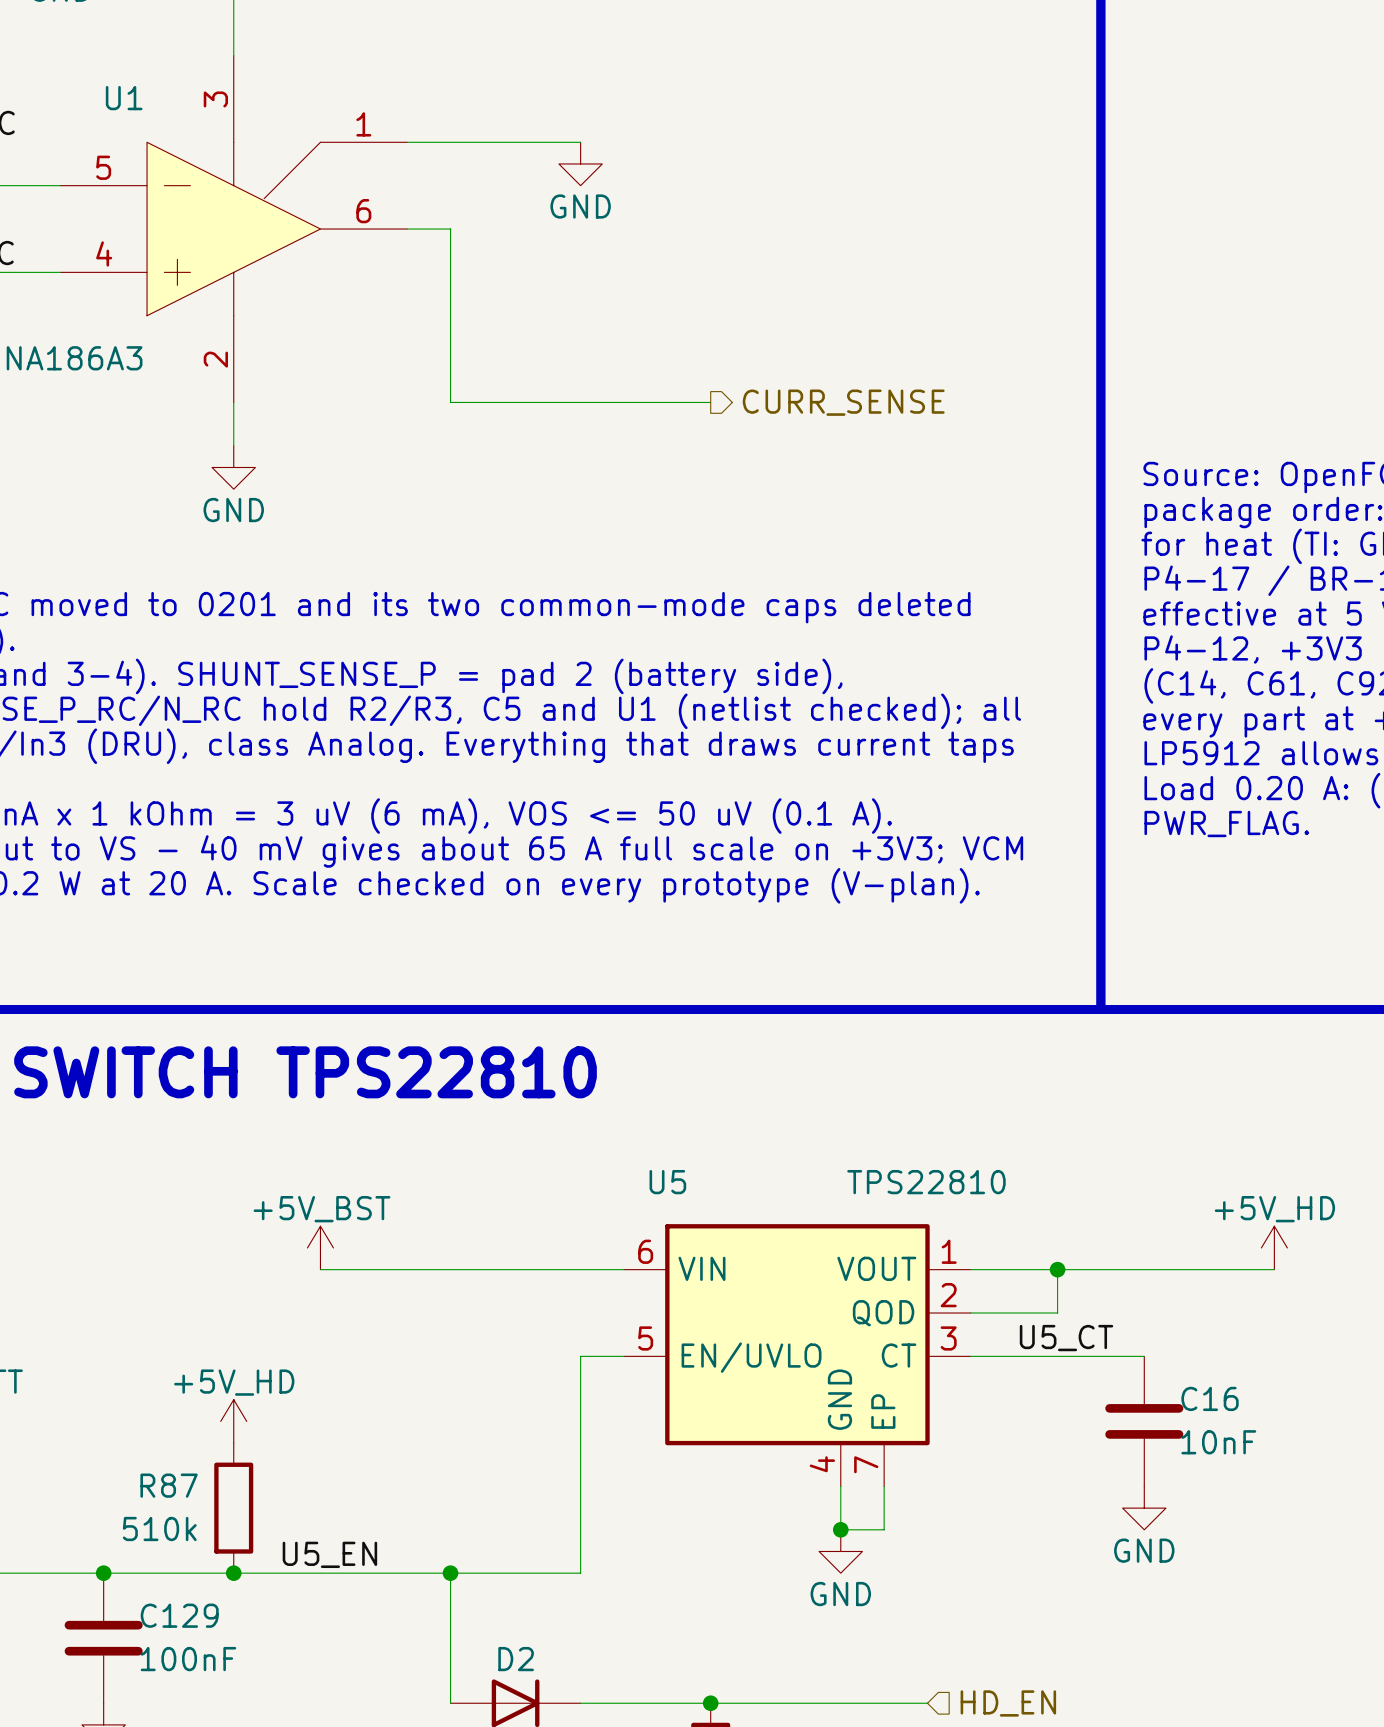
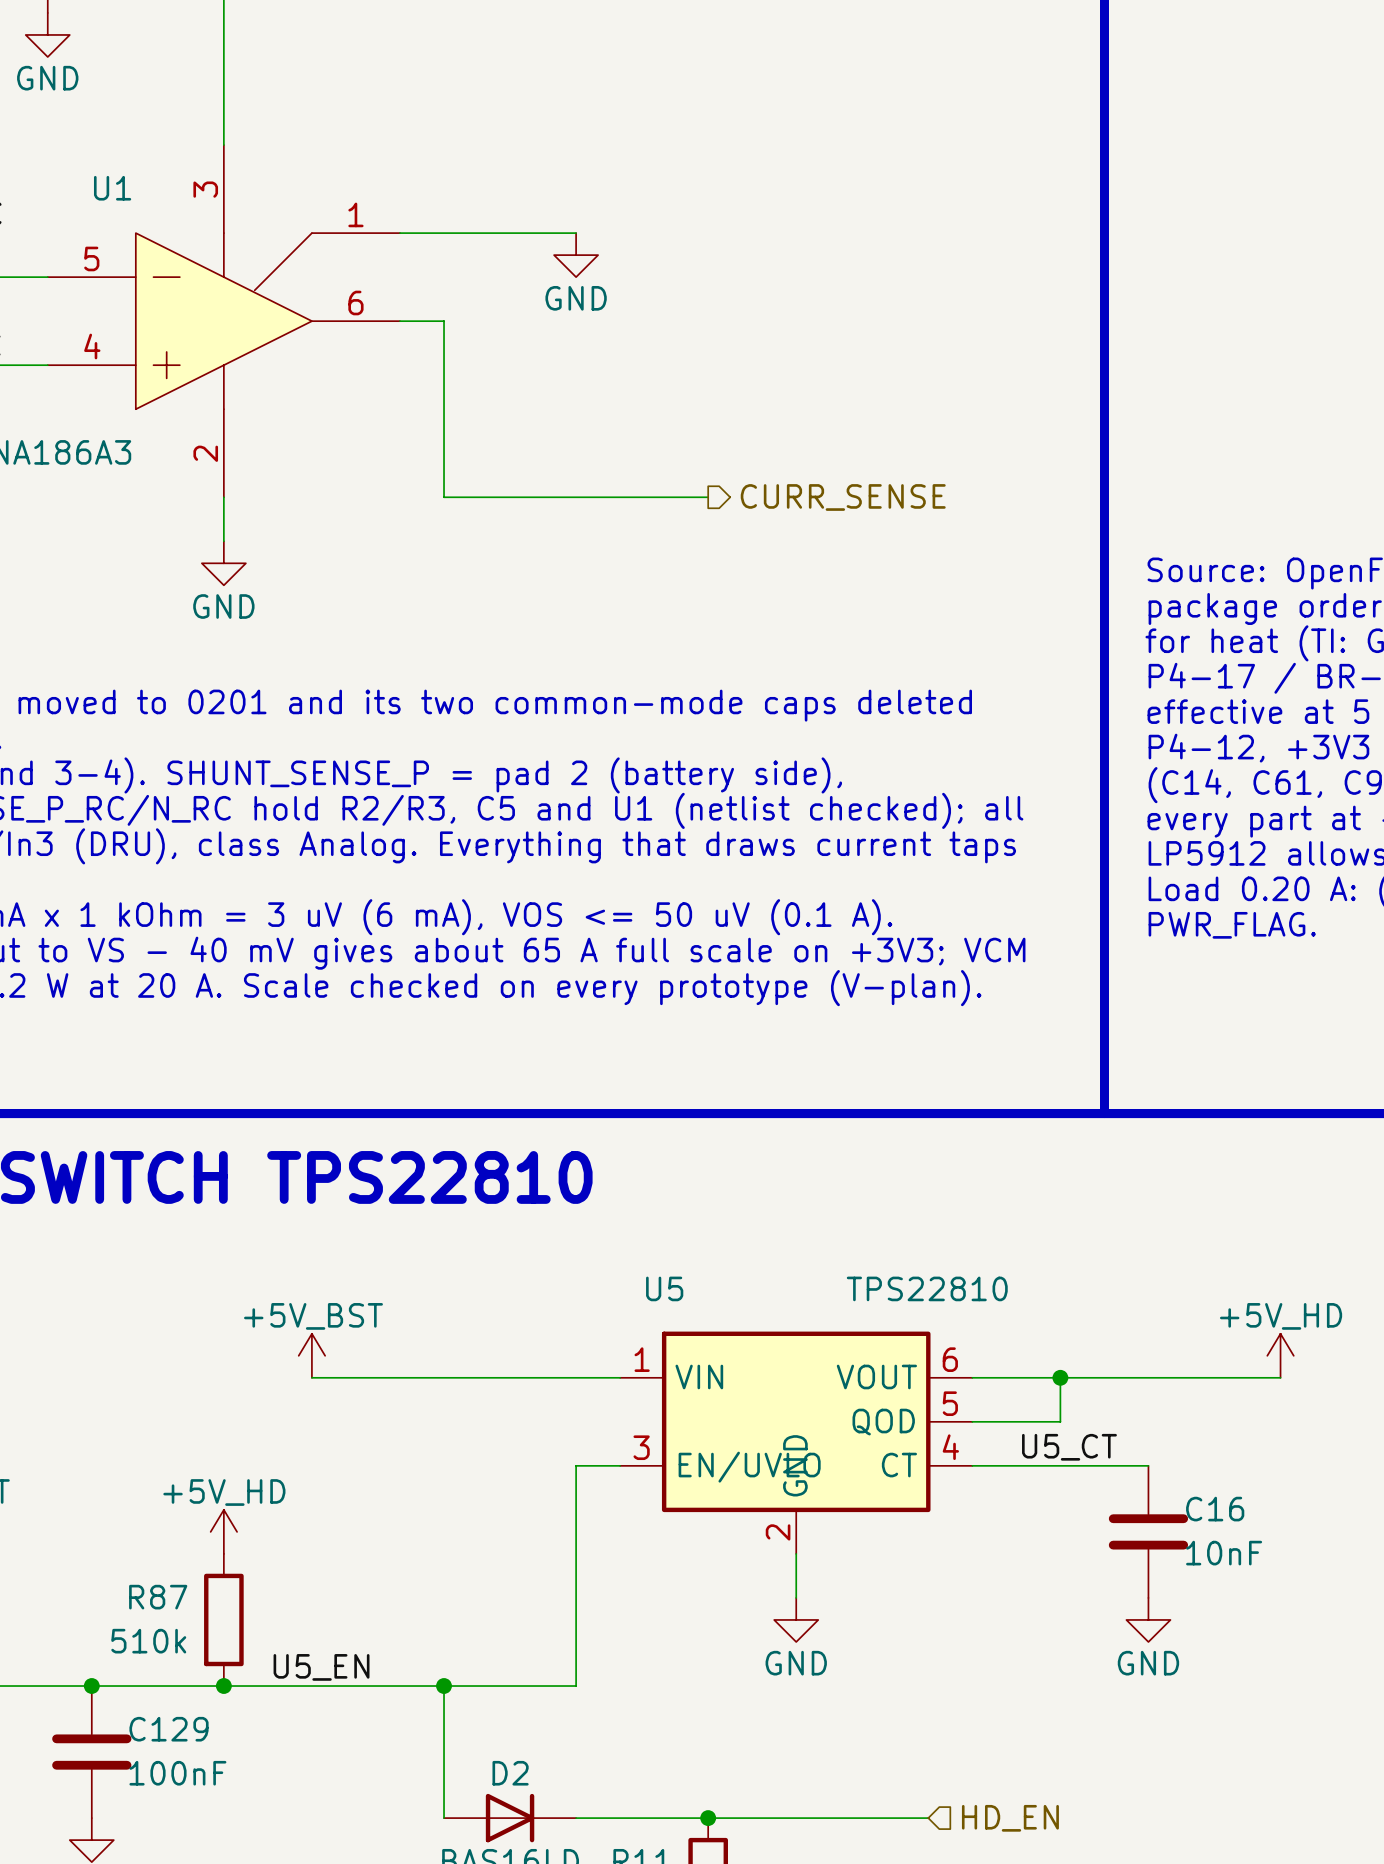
U5 symbol: [623, 1224, 971, 1487] -> [620, 1331, 973, 1554]
wire: none -> (796, 1553) (796, 1597)
wire: (840, 1486) (840, 1529) (884, 1529) (884, 1486) -> none
junction: (840, 1529) -> none
power symbol position: GND (840, 1551) -> GND (796, 1619)

